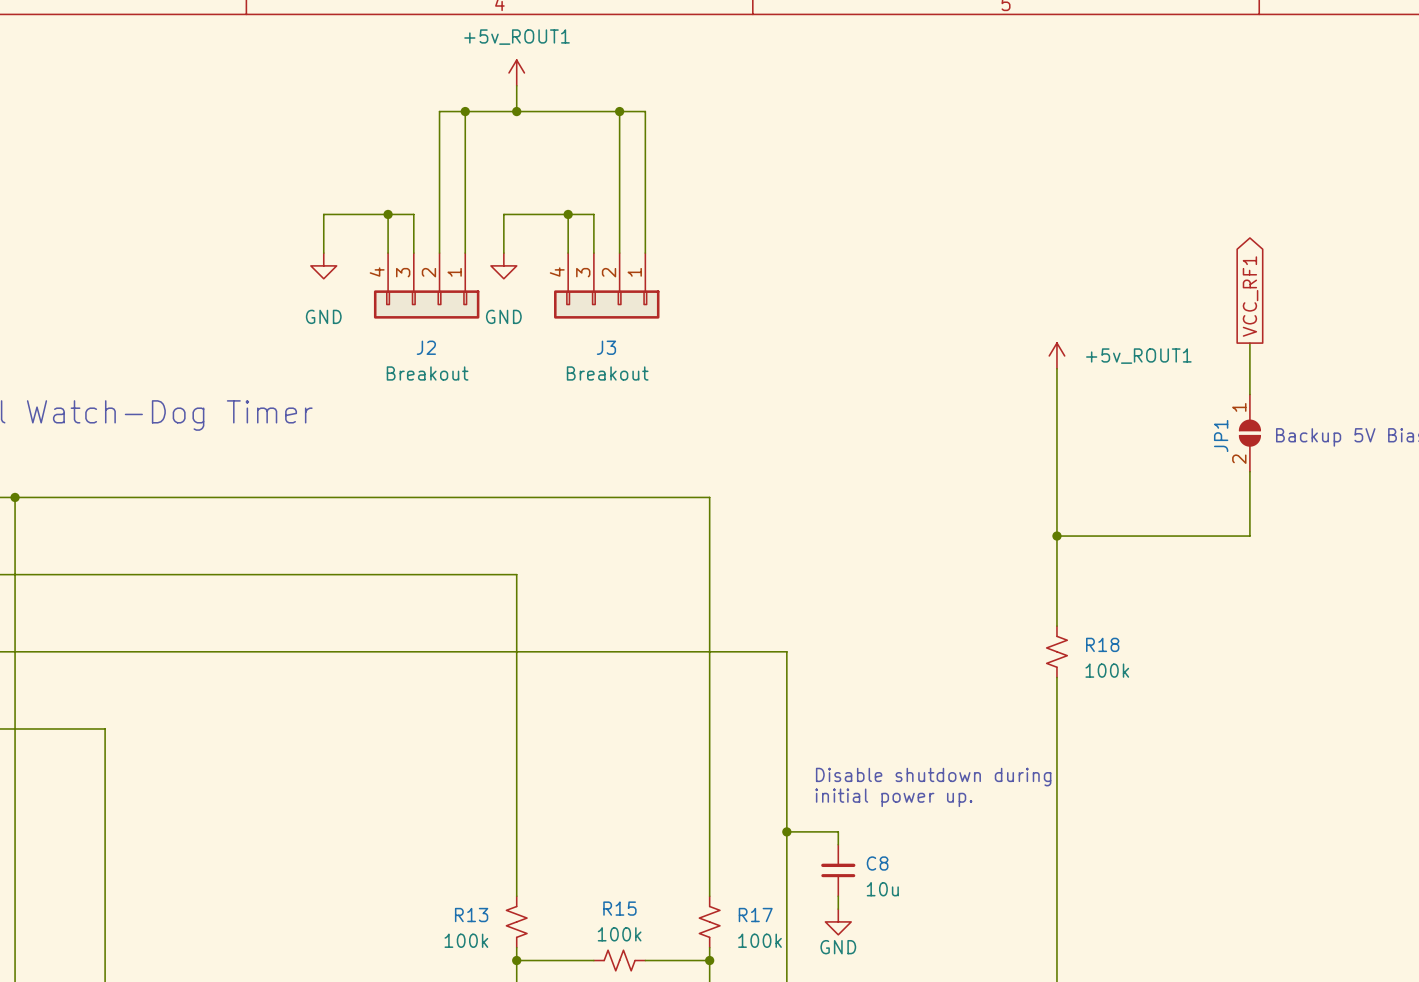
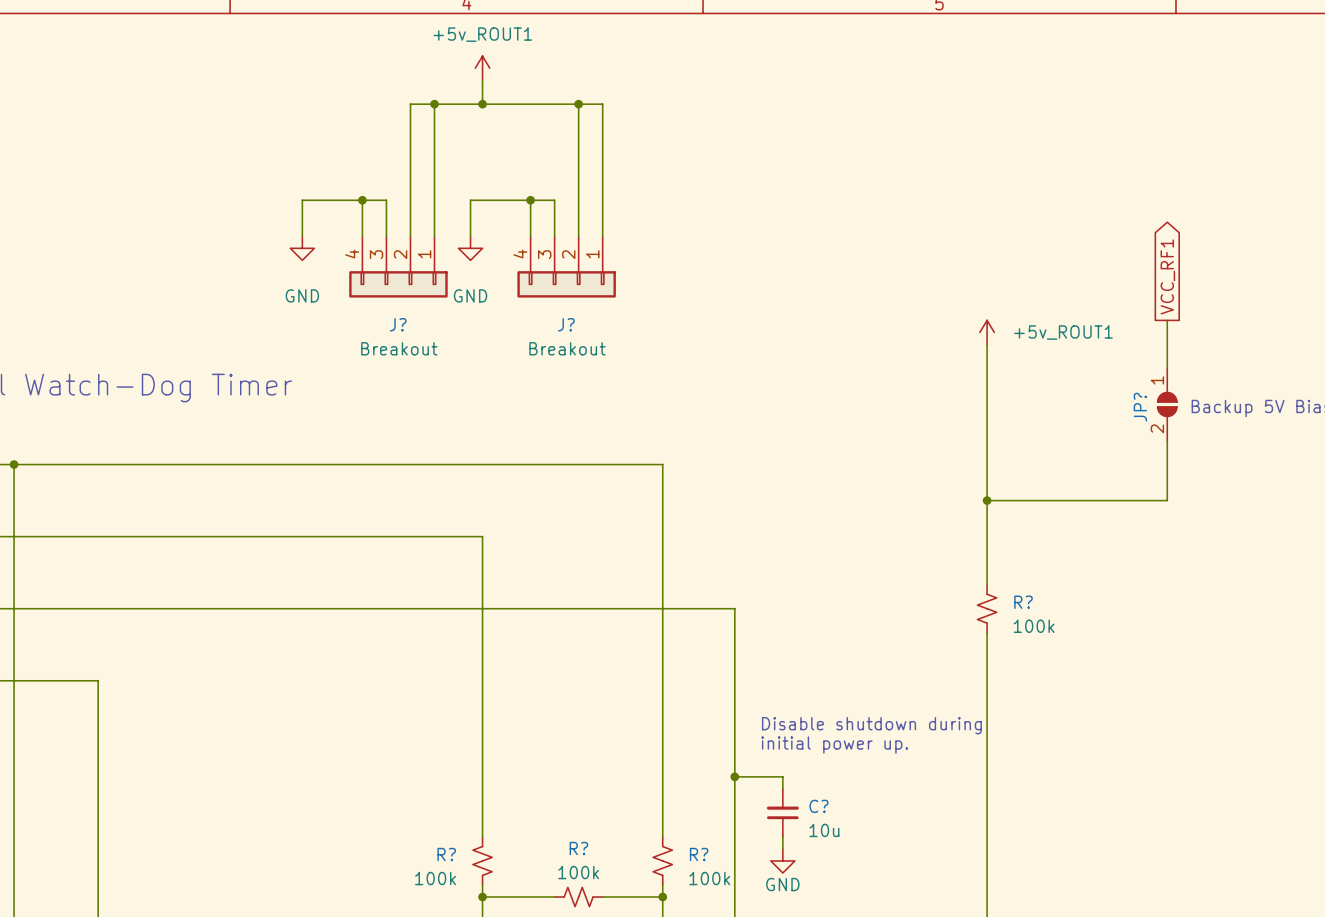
J2 name: J2 (426, 347) -> J? (398, 324)
J3 name: J3 (606, 347) -> J? (566, 324)
JP1 name: JP1 (1221, 436) -> JP? (1140, 407)
R18 name: R18 (1102, 644) -> R? (1023, 602)
C8 name: C8 (877, 863) -> C? (818, 806)
R15 name: R15 (619, 908) -> R? (578, 848)
R13 name: R13 (471, 915) -> R? (446, 854)
R17 name: R17 (755, 915) -> R? (699, 854)

